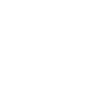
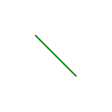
wire: none -> (35, 35) (76, 76)

